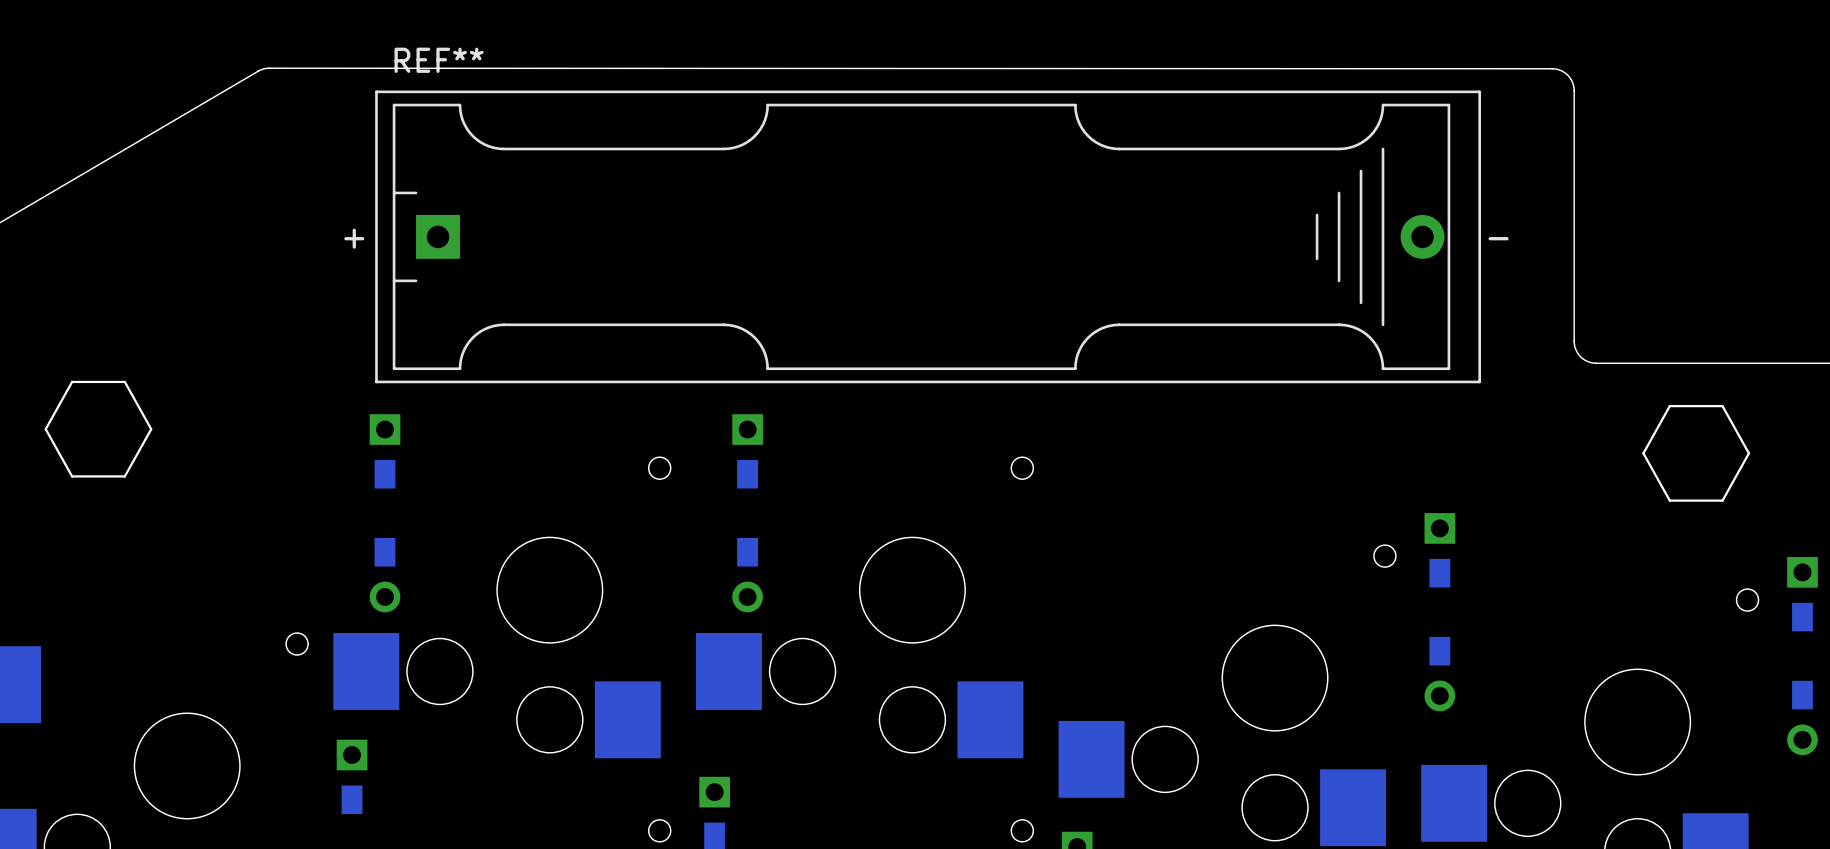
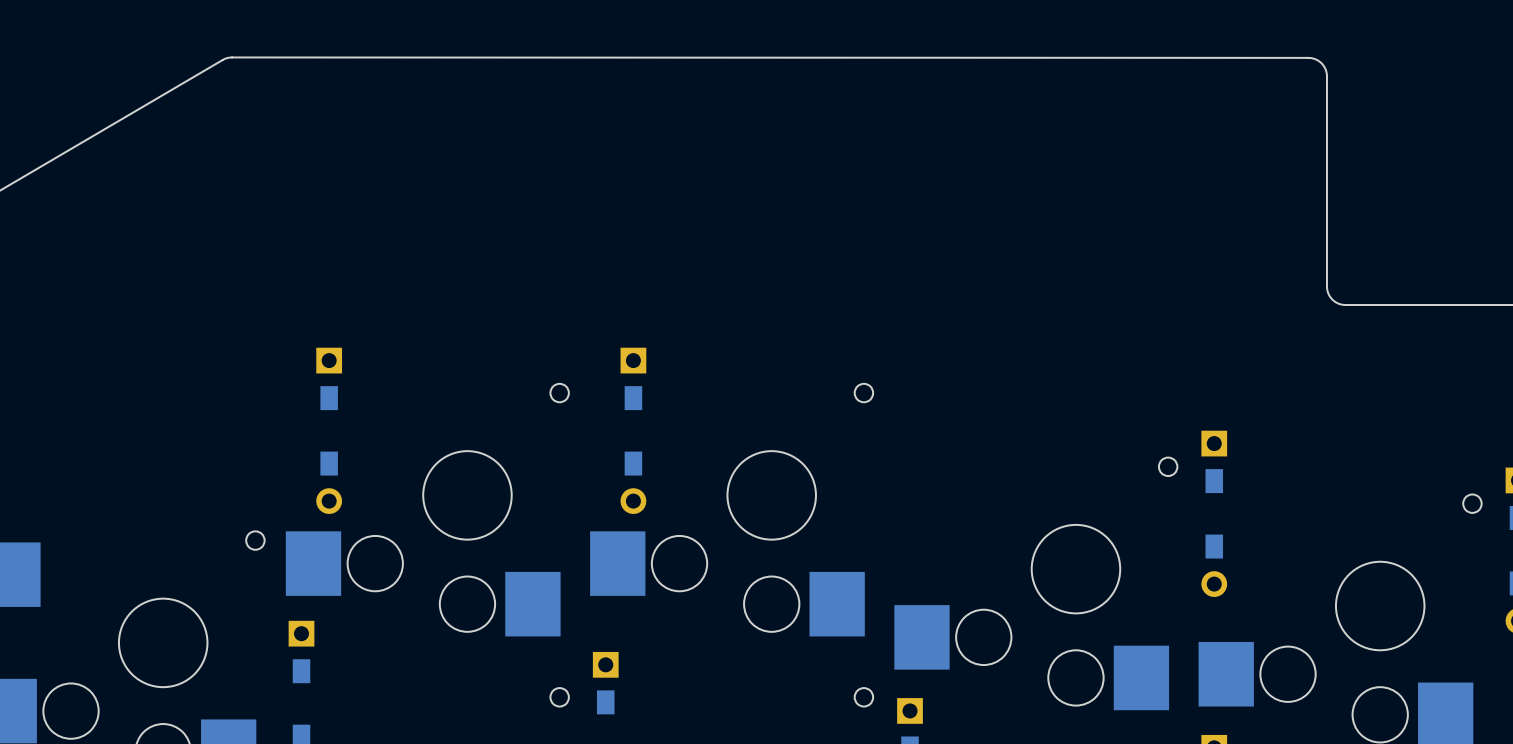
REF**: (928, 236) -> none
drawing: [44, 380, 153, 478] -> none
drawing: [1642, 405, 1751, 502] -> none

